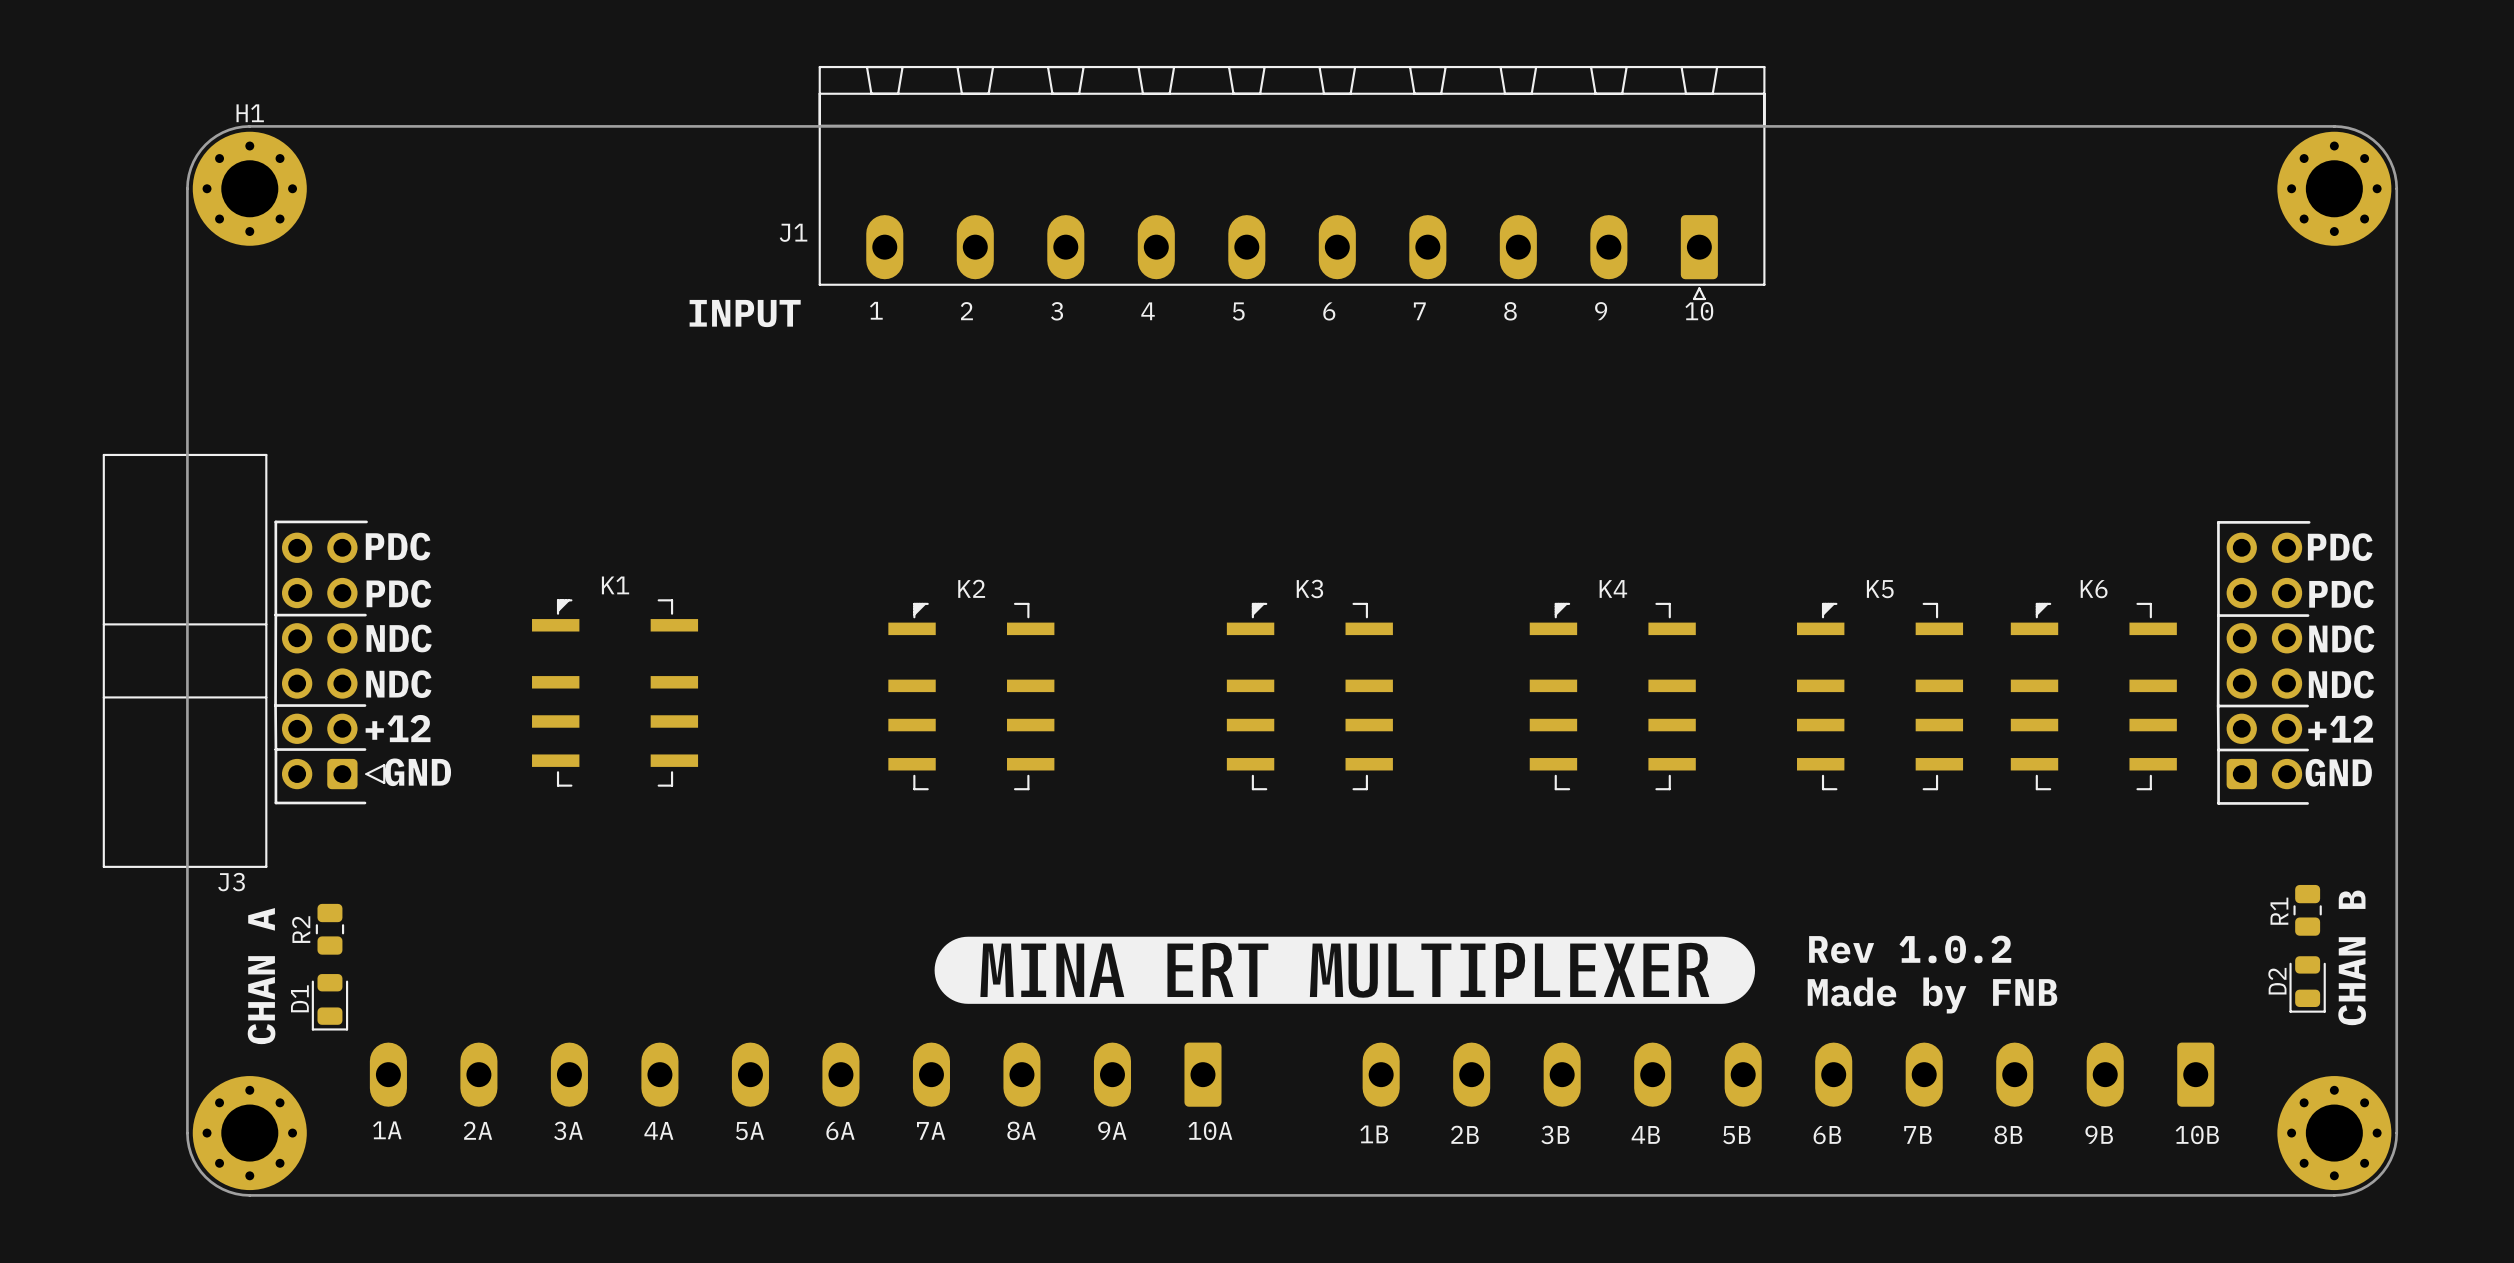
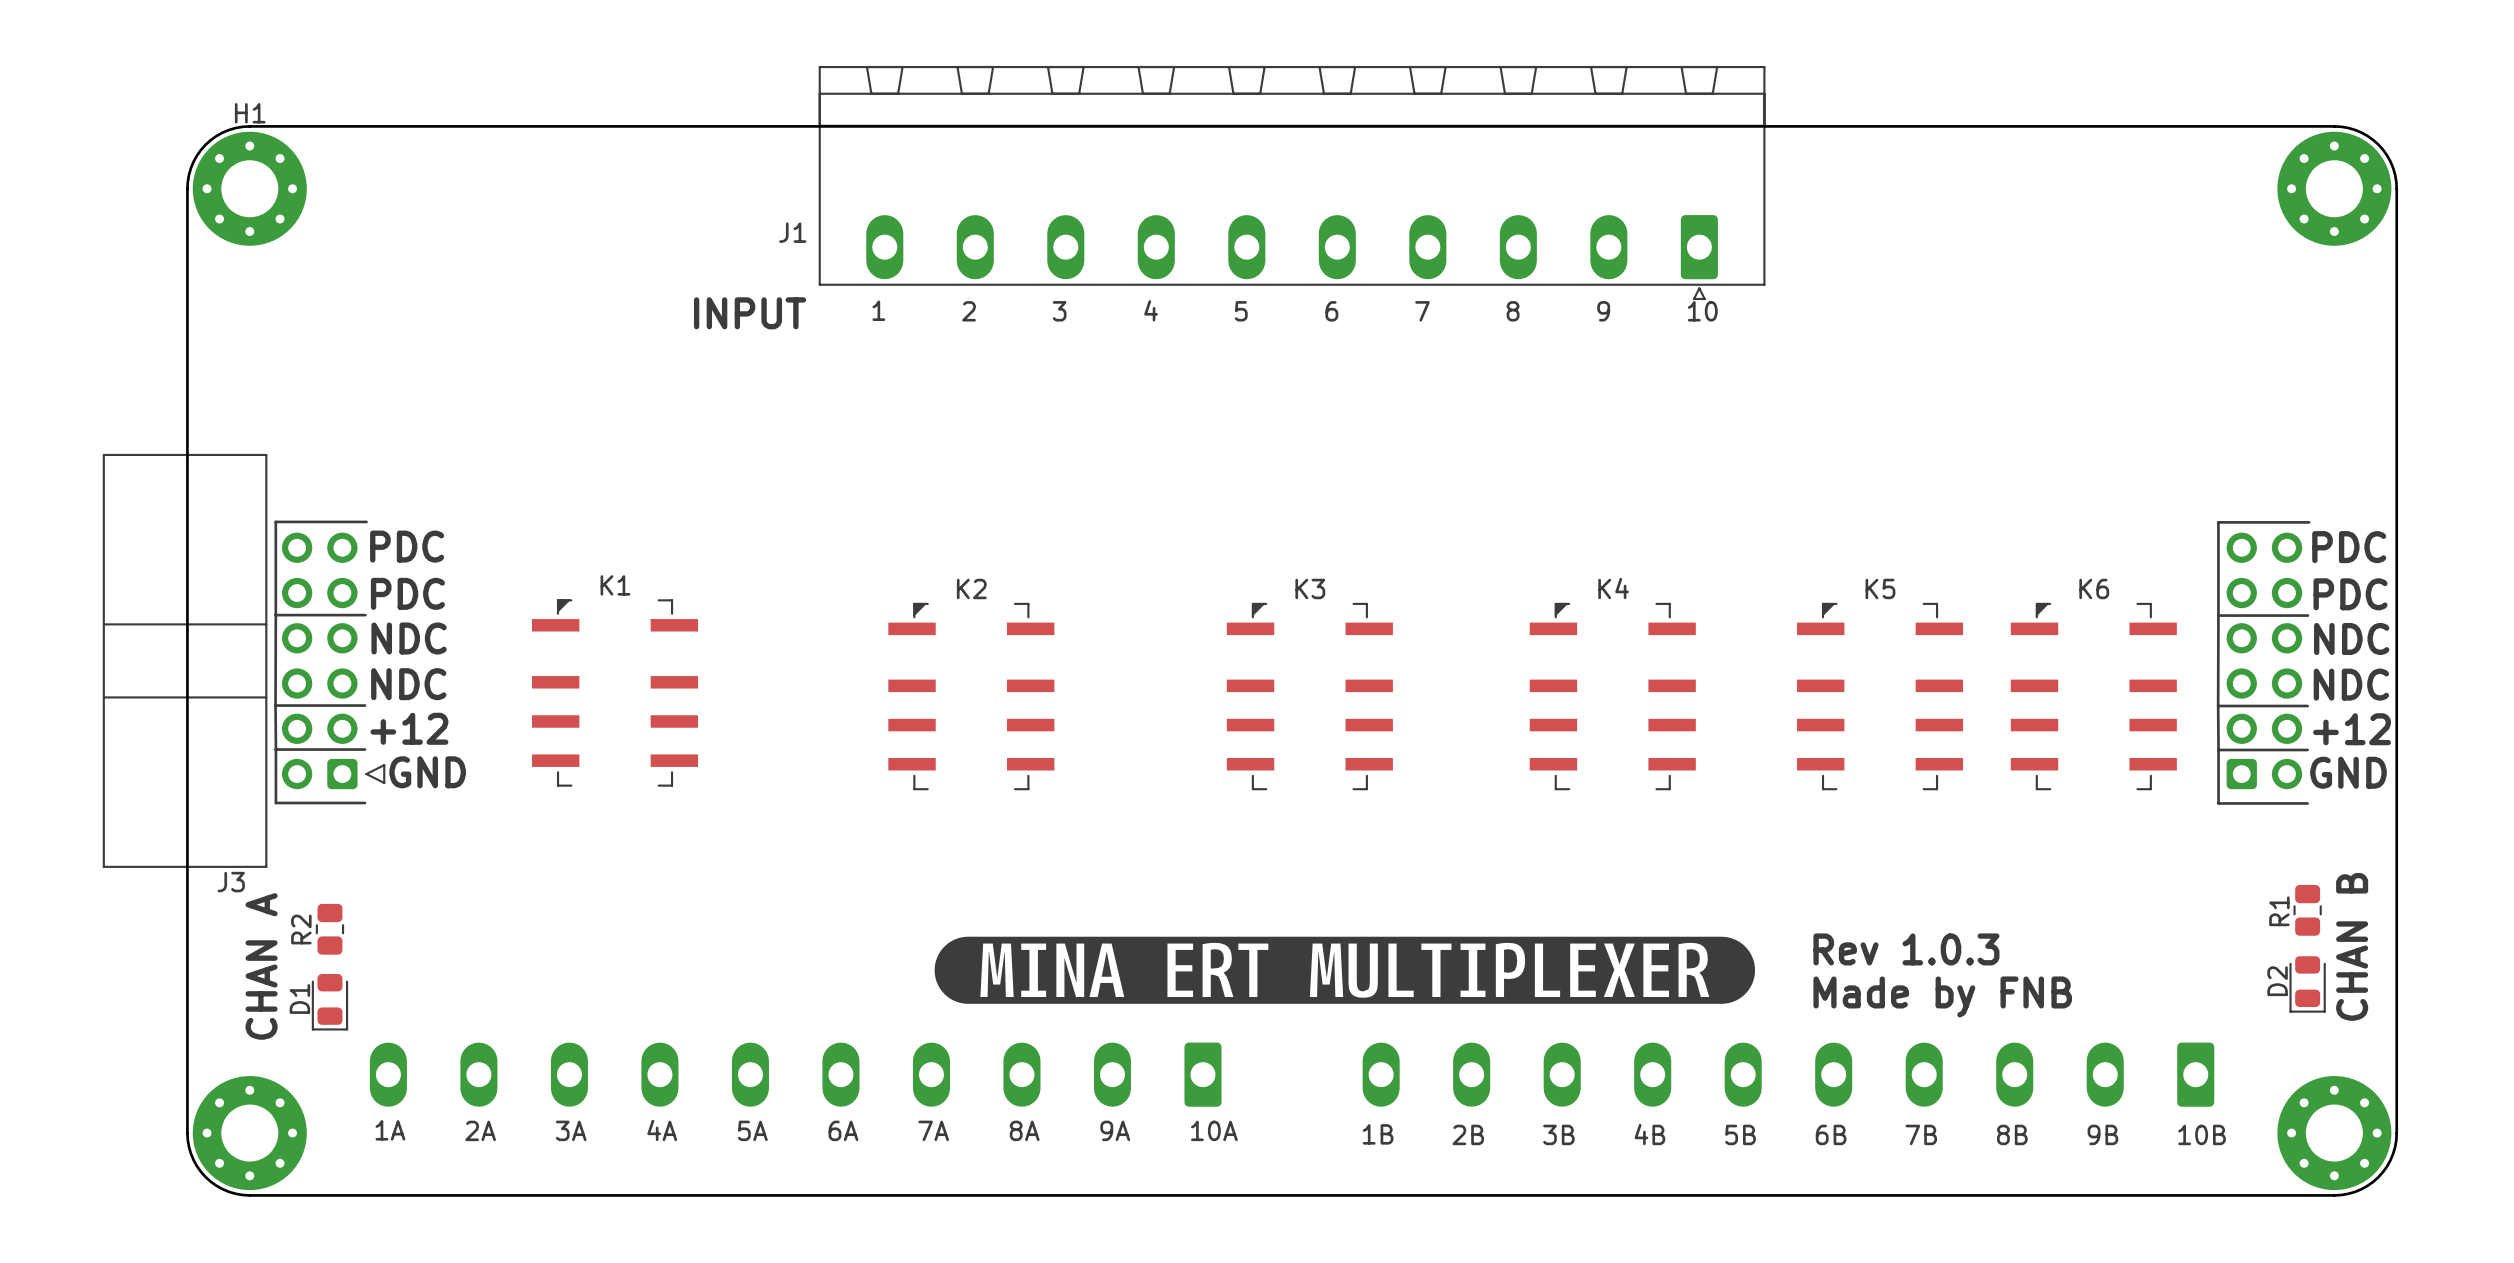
text: Rev 1.0.2 (1910, 949) -> Rev 1.0.3 (1906, 949)

